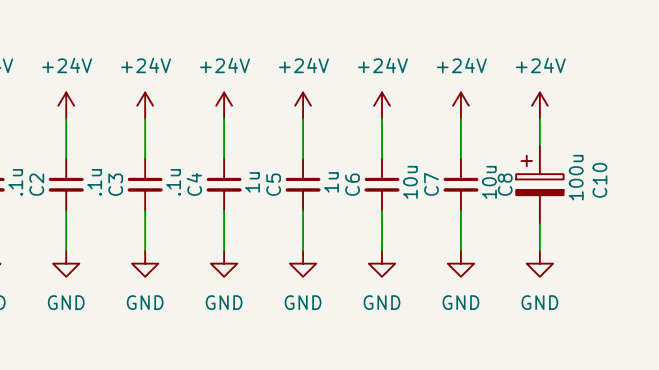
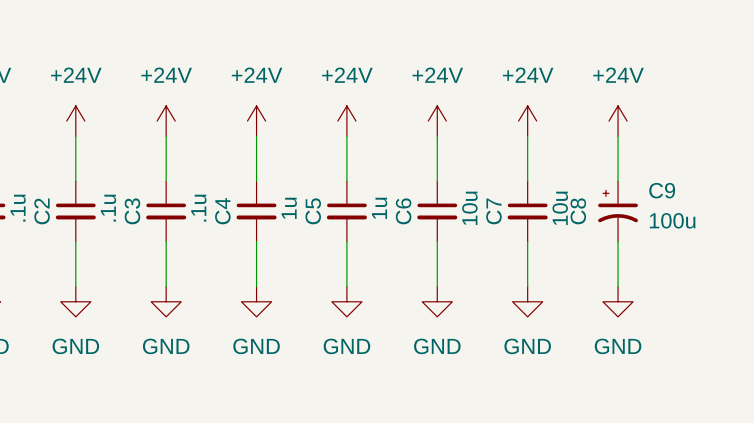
C10: 100u (539, 184) -> none
C9: none -> 100u (618, 211)

